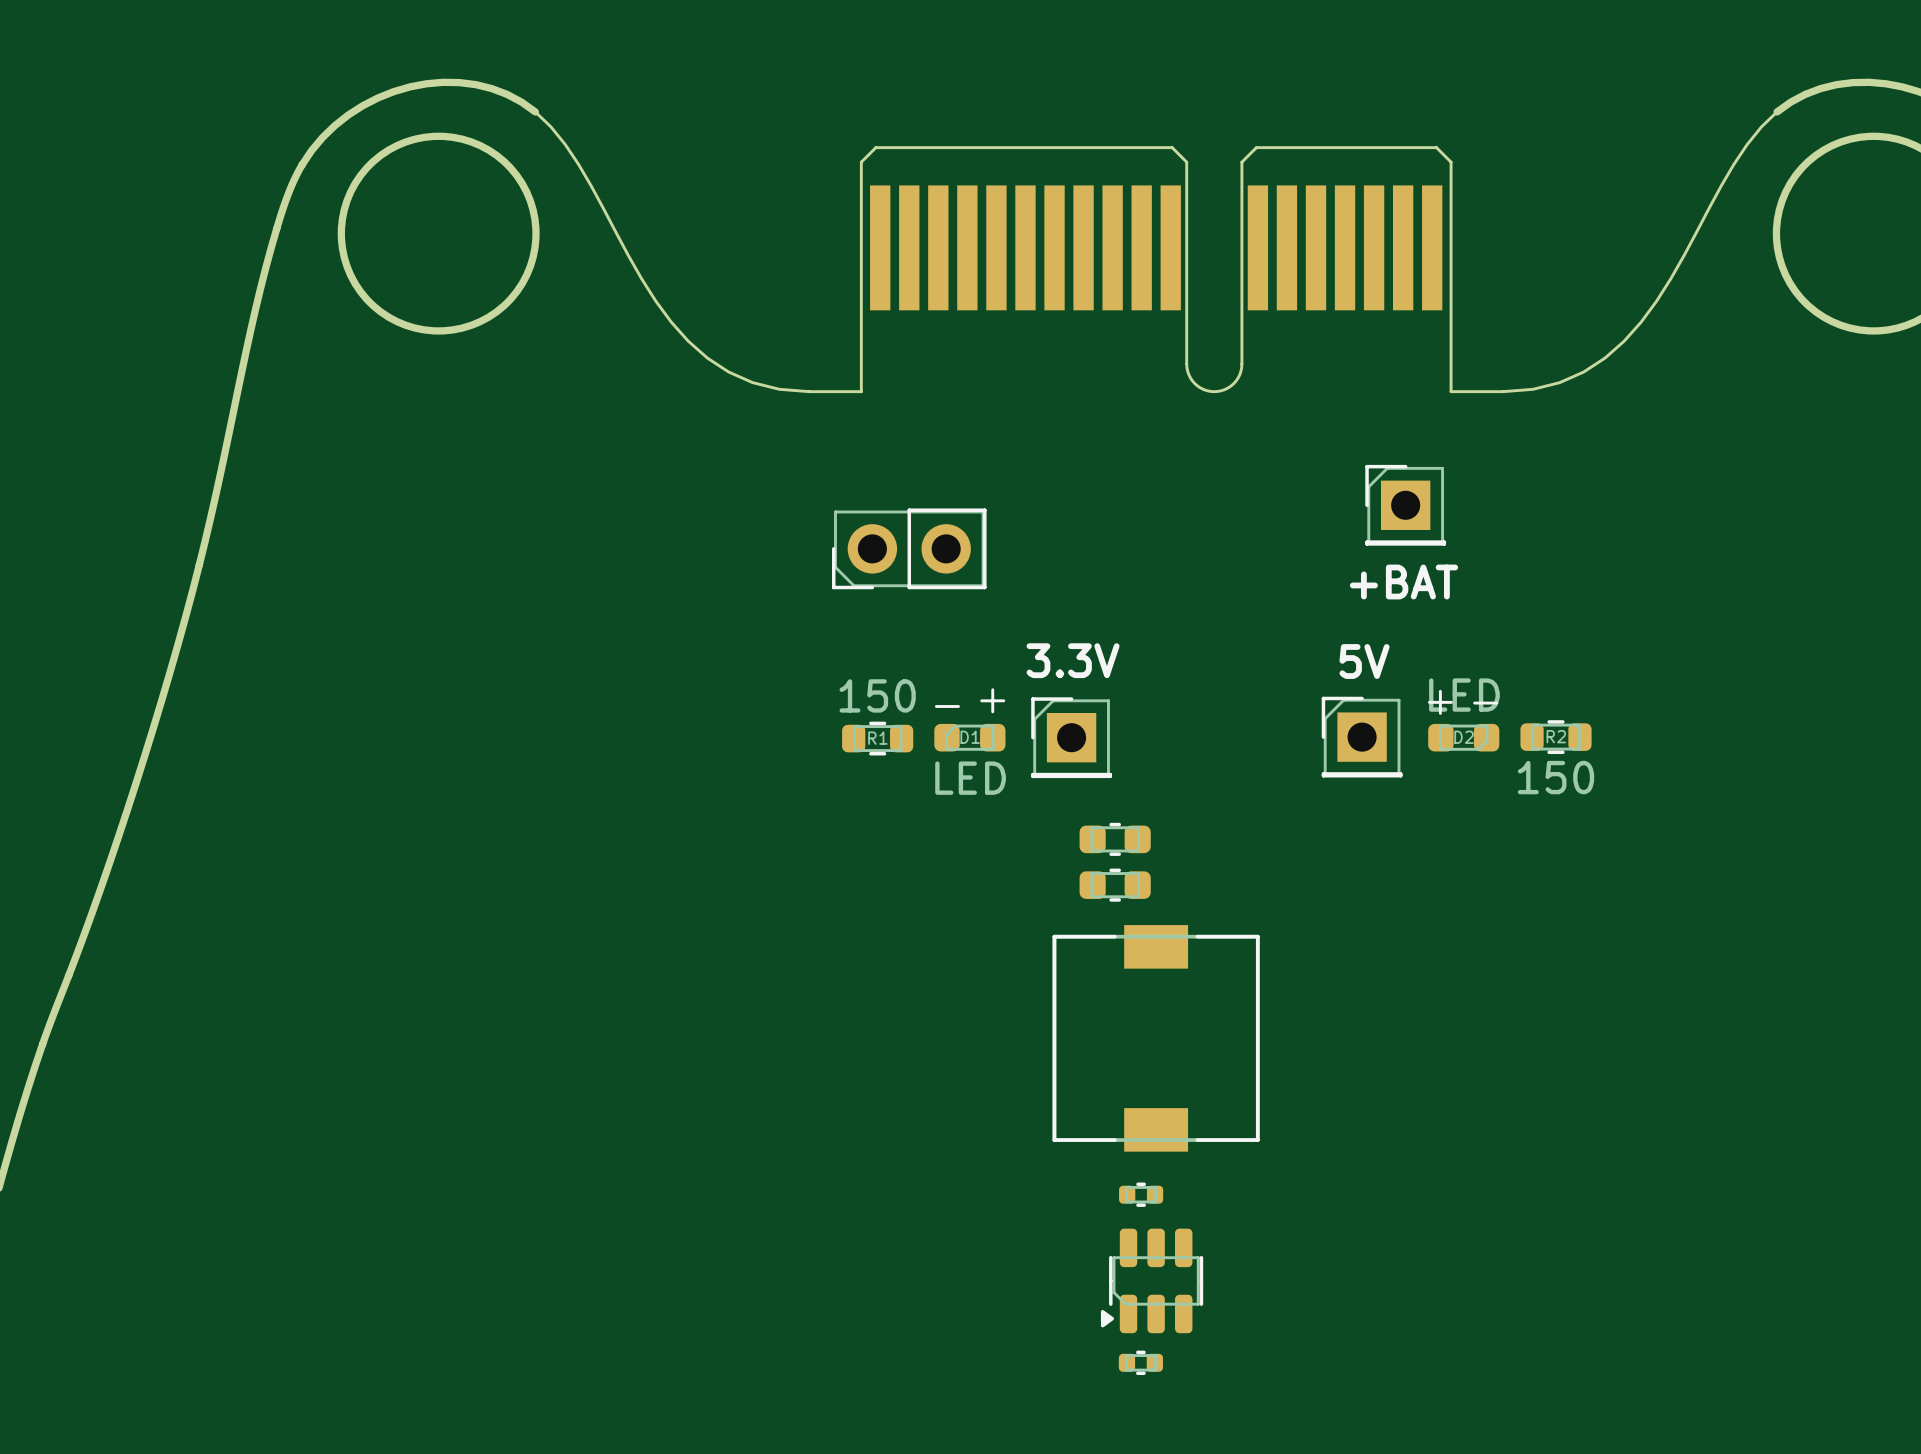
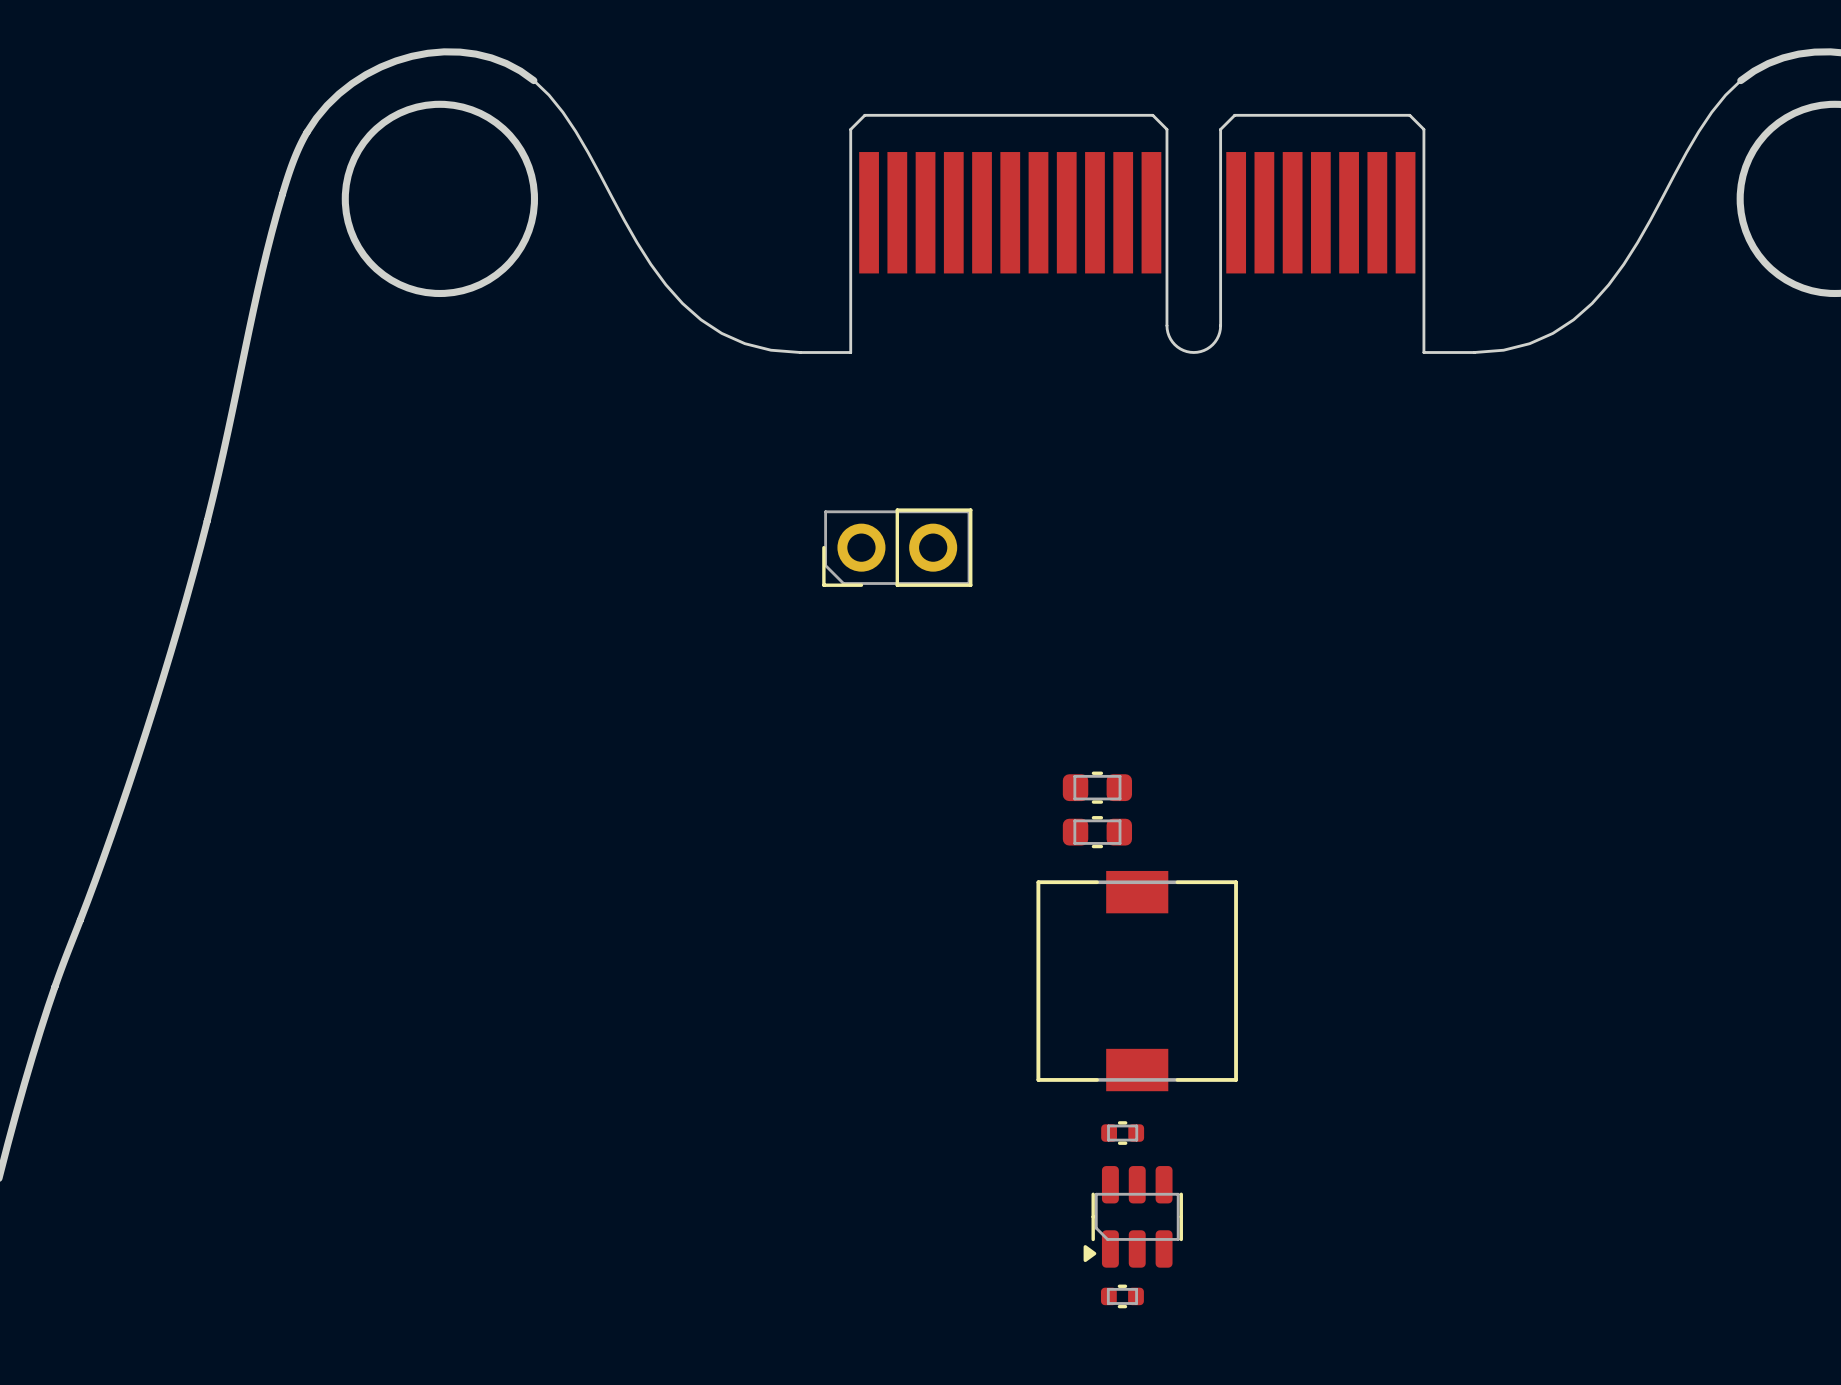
part: (1405, 505) -> none
part position: (909, 548) -> (897, 547)
text: +BAT (1404, 582) -> none
text: 3.3V (1073, 660) -> none
text: 5V (1364, 661) -> none
D1: LED (969, 737) -> none
part: (1071, 737) -> none
part: (1362, 737) -> none
D2: LED (1463, 737) -> none
R2: 150 (1556, 737) -> none
R1: 150 (877, 738) -> none

